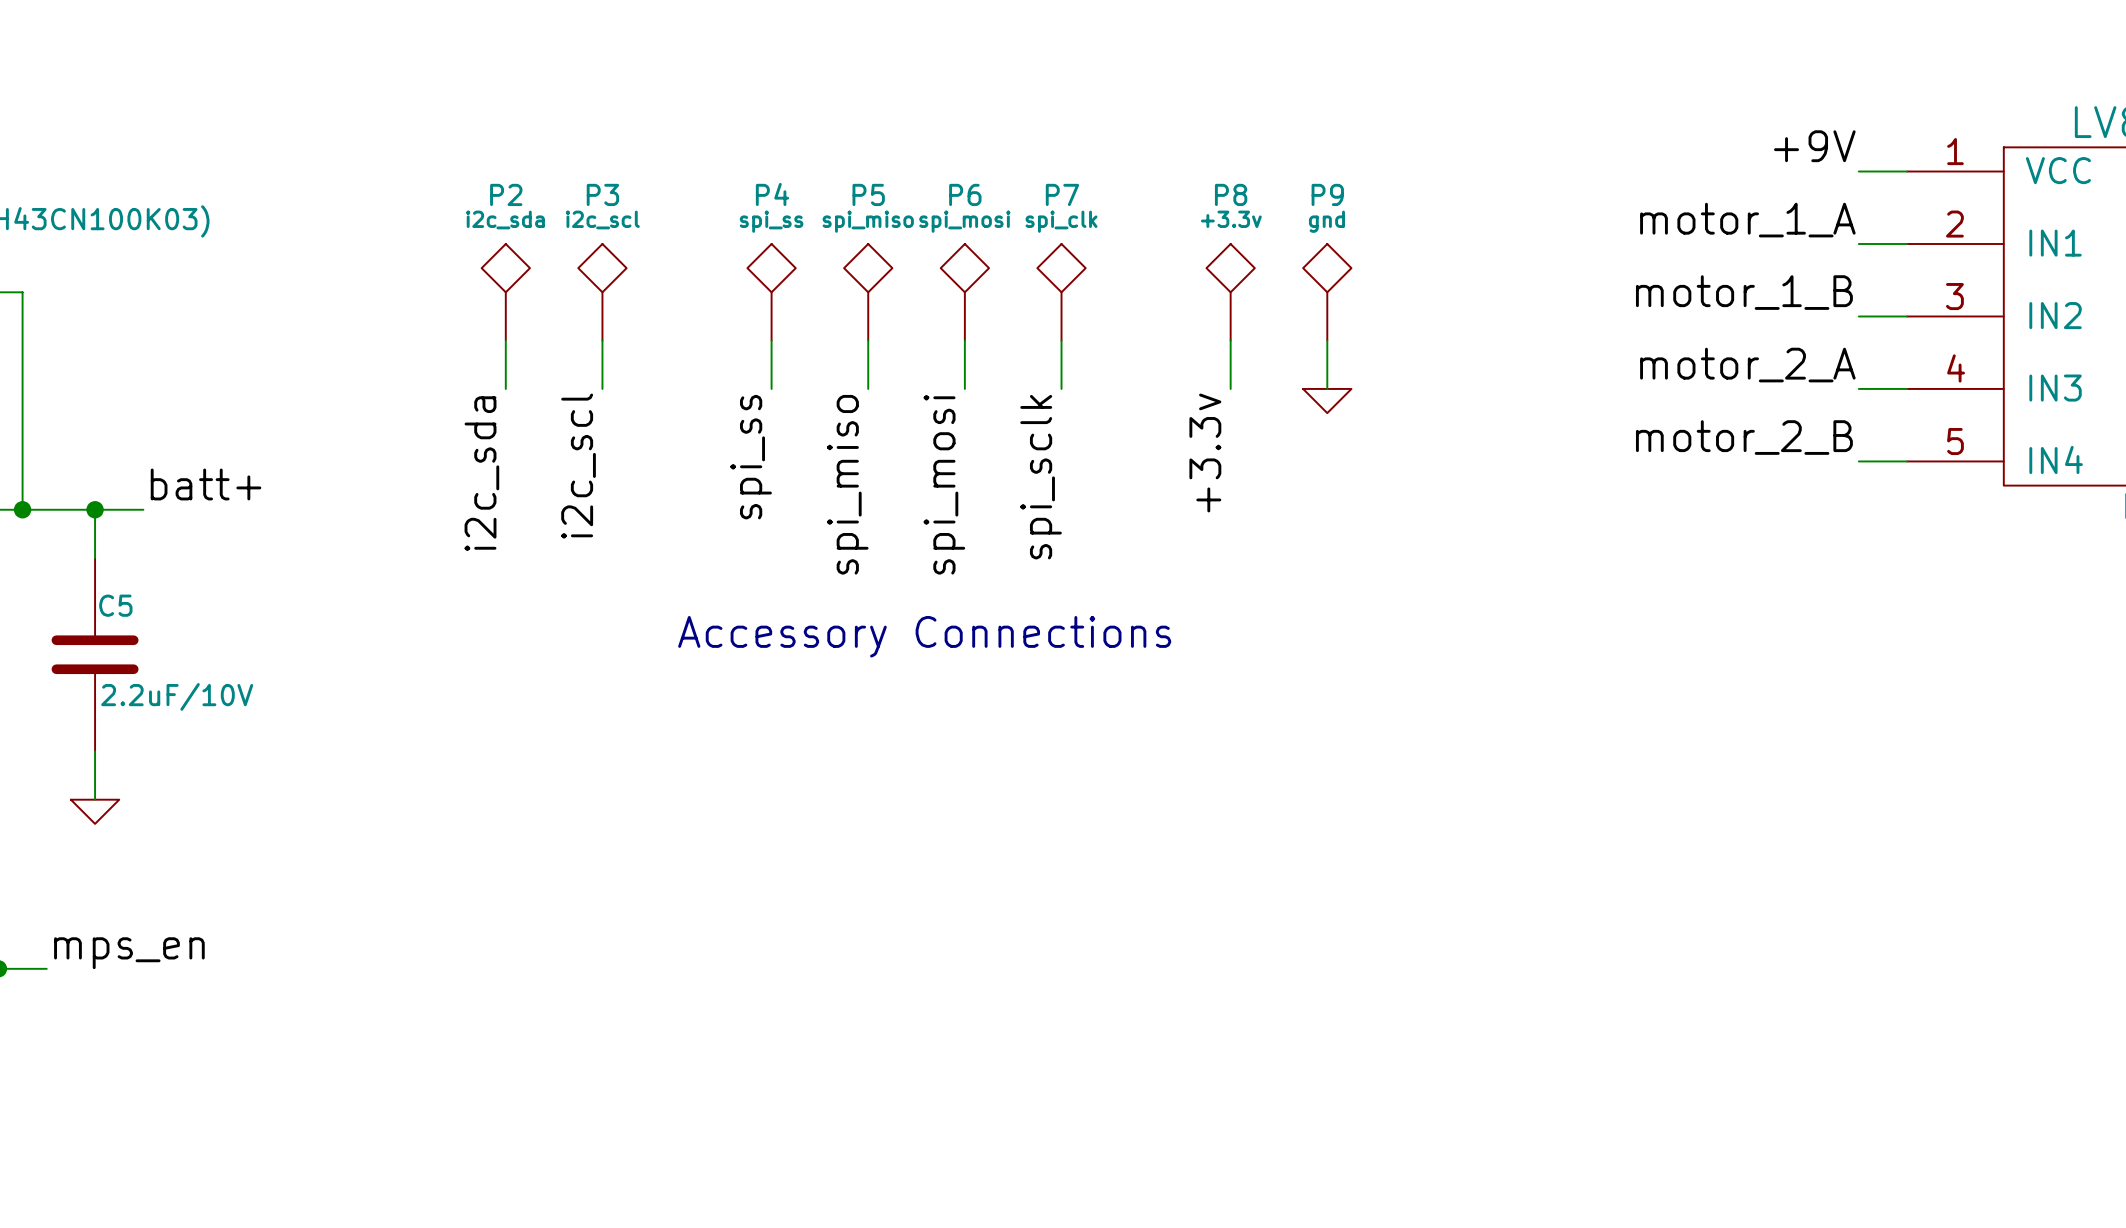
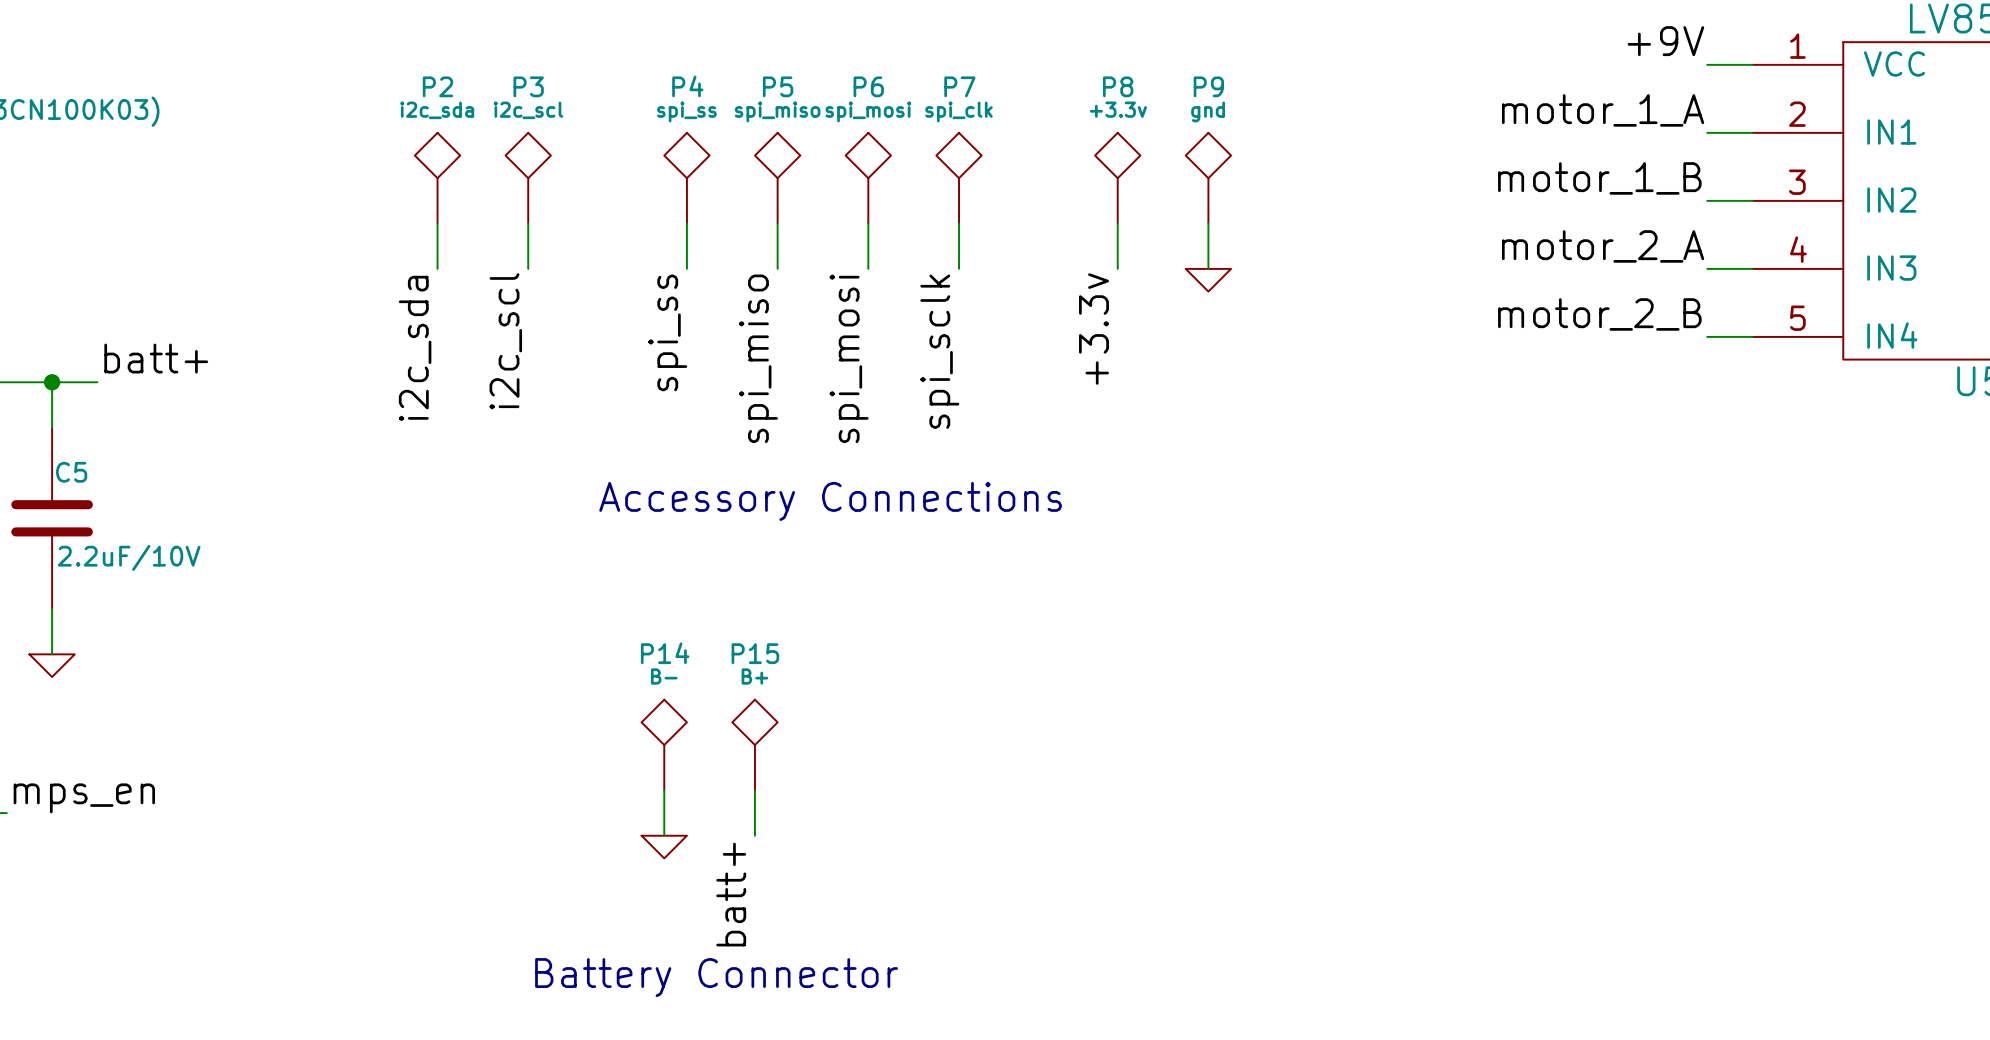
P14: none -> B- (664, 745)
P15: none -> B+ (754, 745)
wire: none -> (664, 790) (664, 835)
wire: none -> (754, 790) (754, 835)
power symbol: none -> (664, 847)
label: none -> batt+ (731, 894)
text: none -> Battery Connector (716, 977)

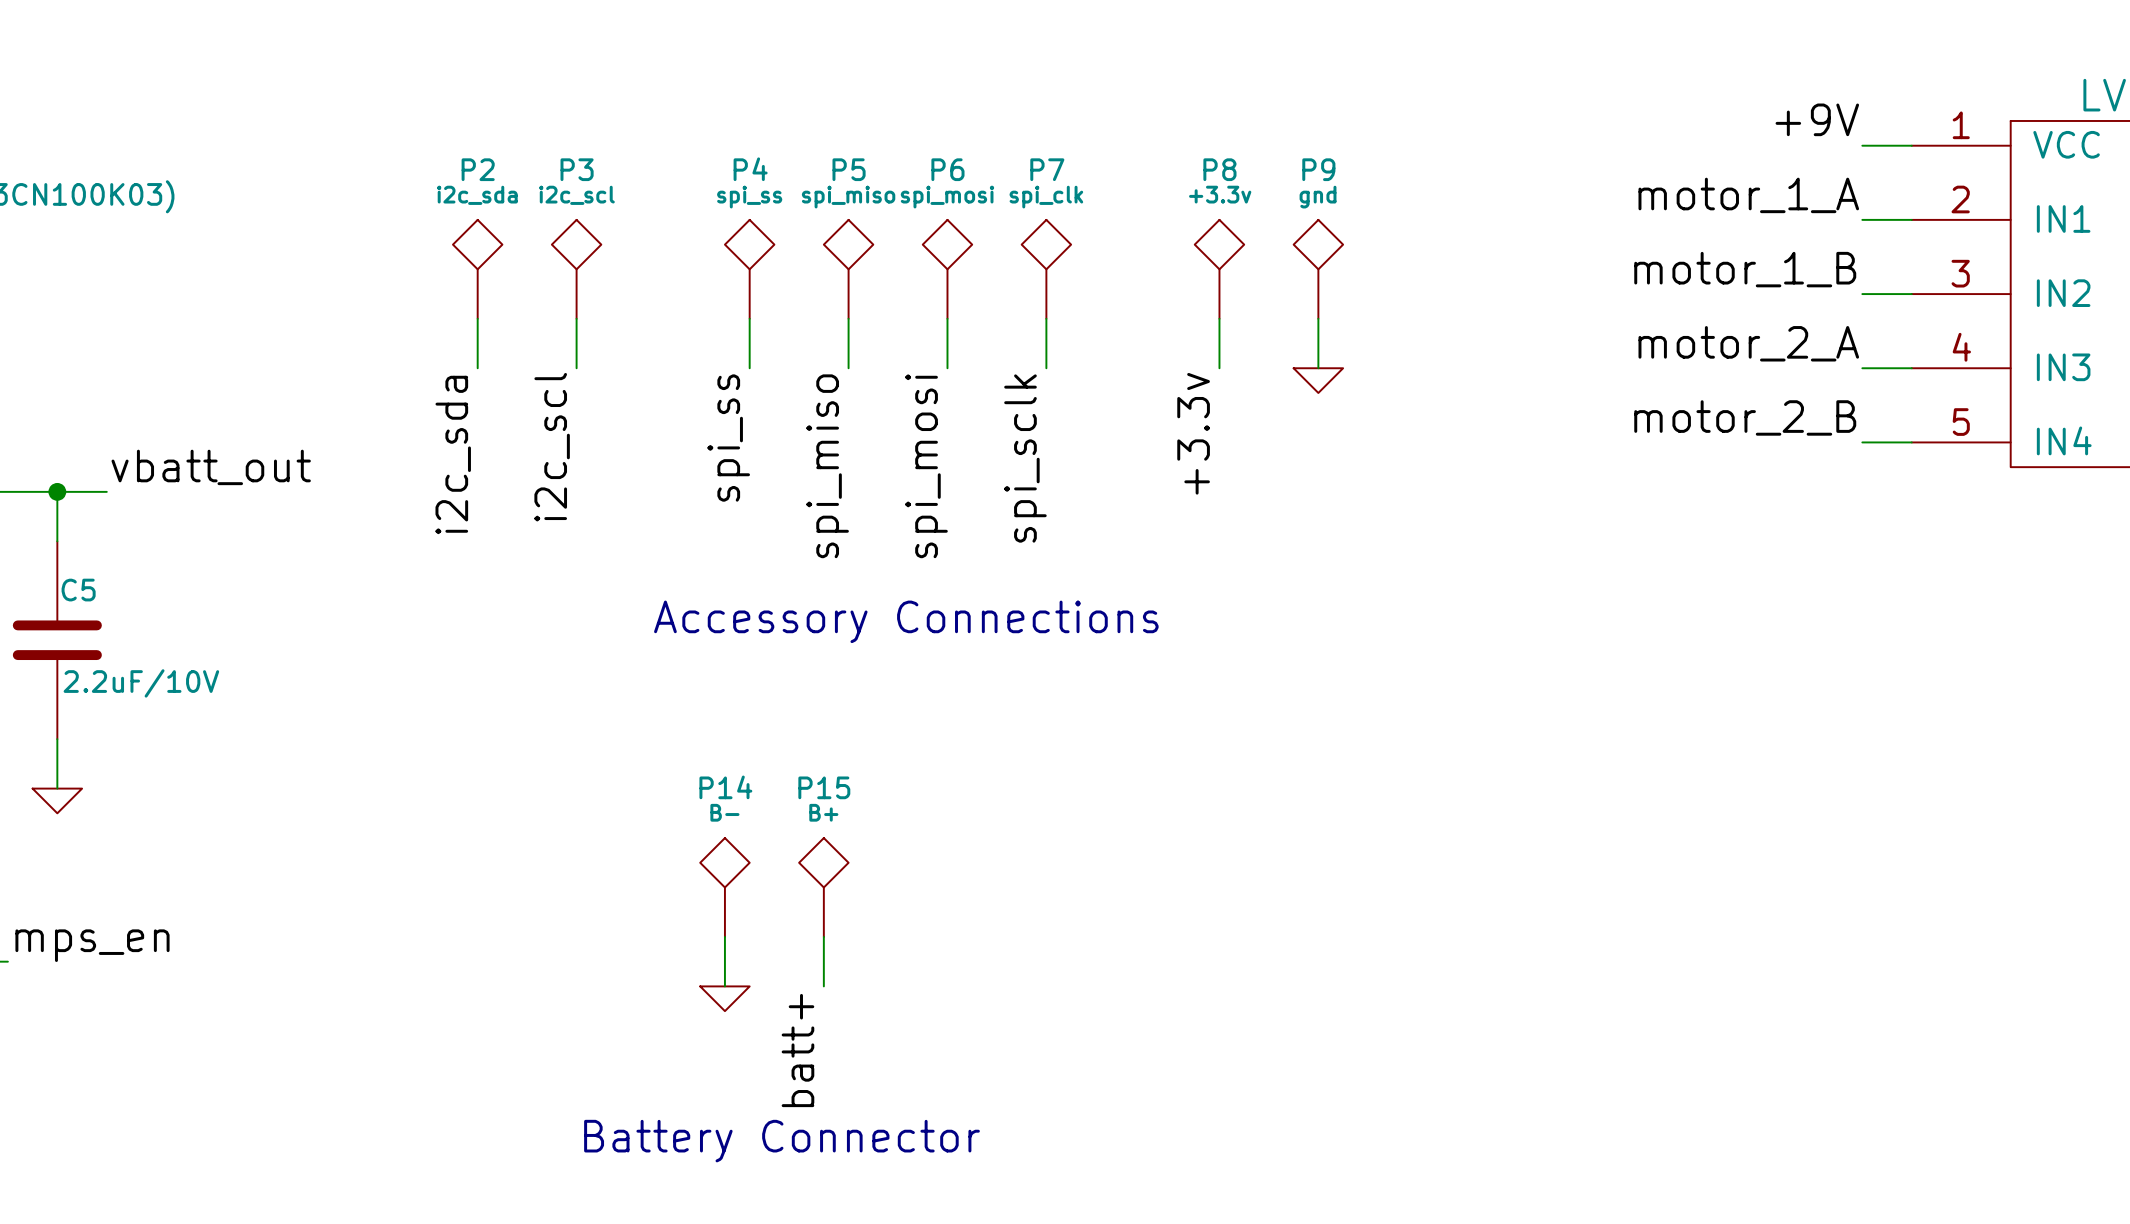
label: batt+ (156, 358) -> vbatt_out (211, 467)

